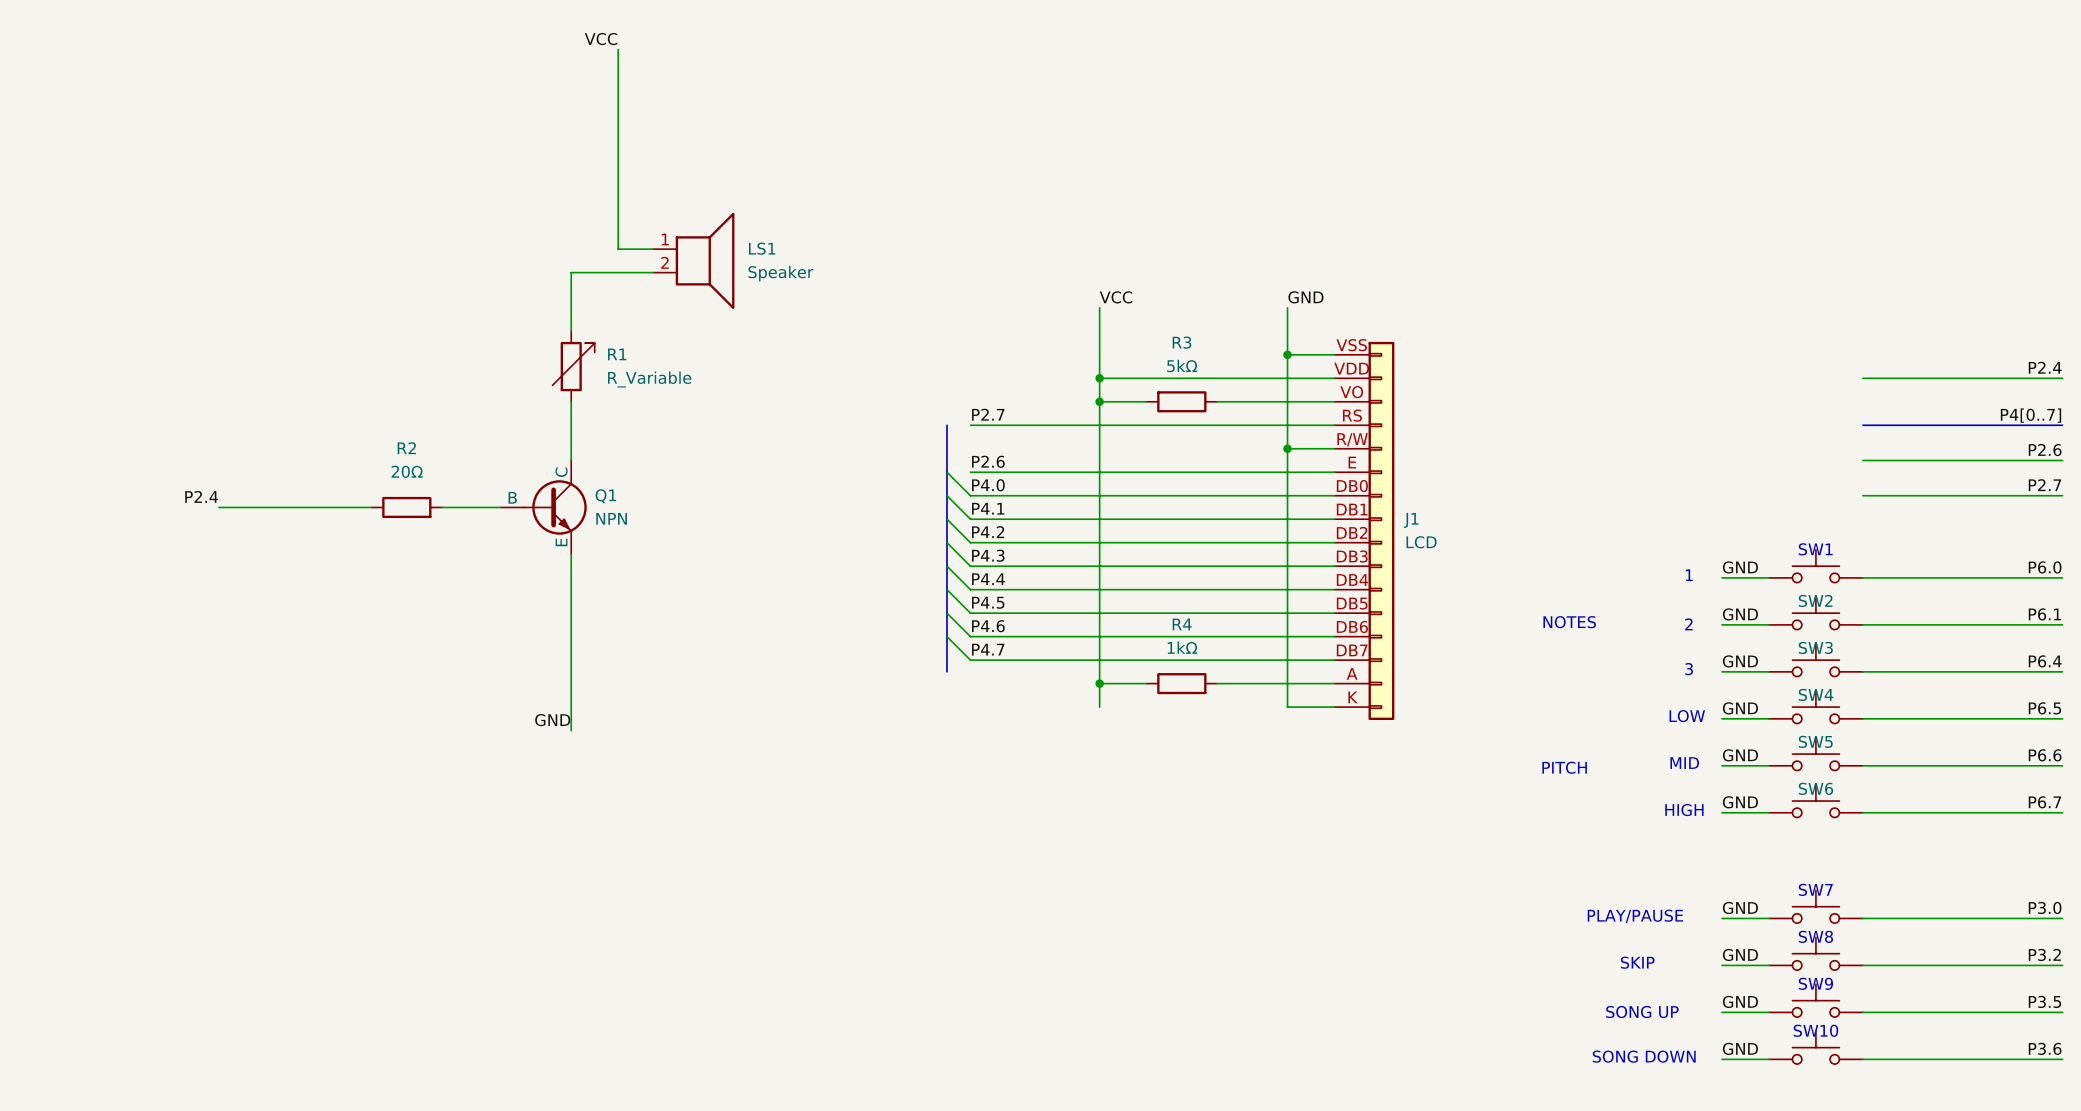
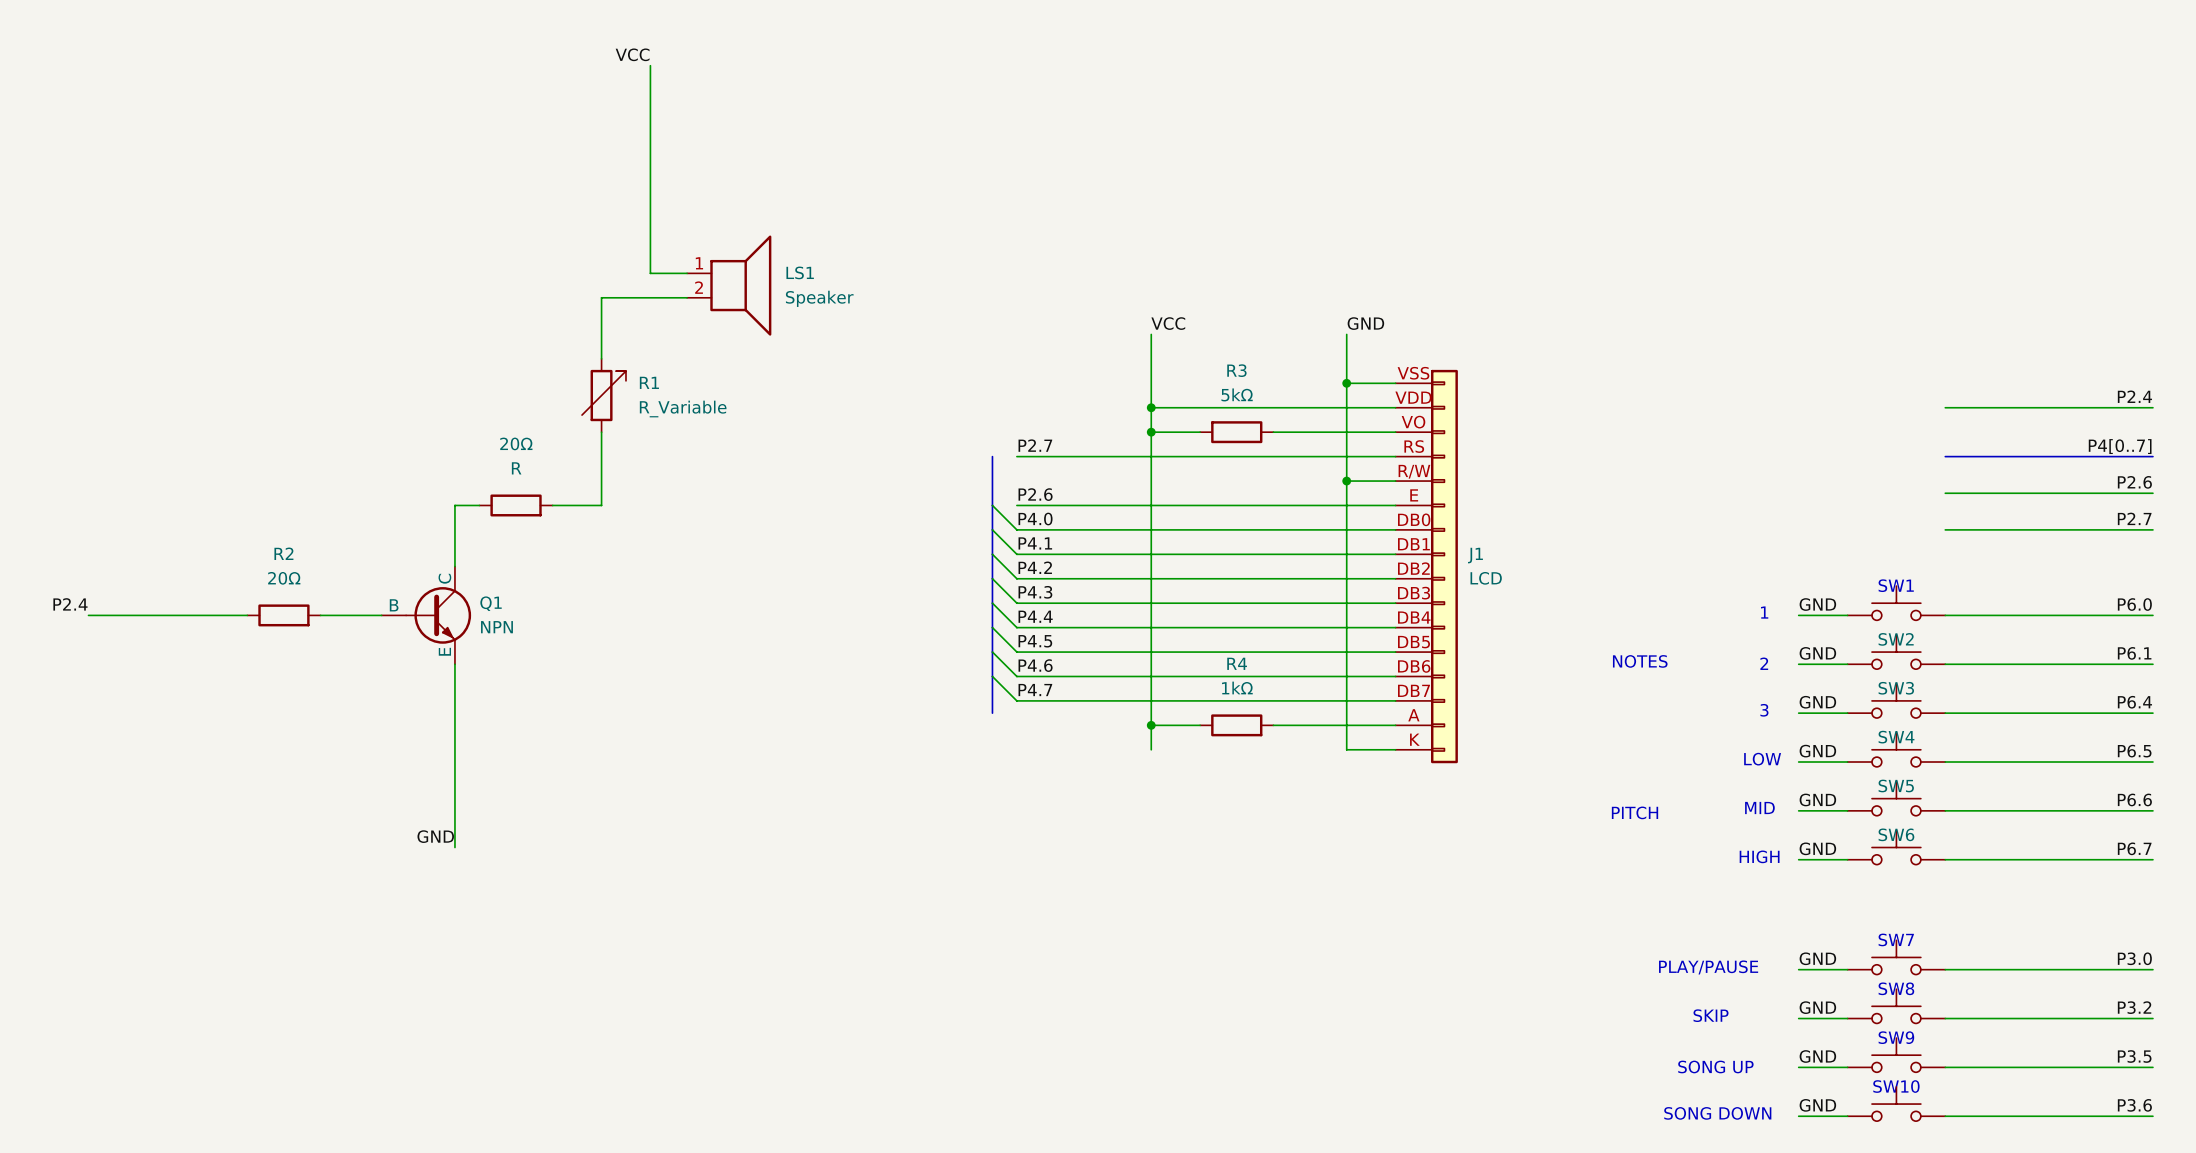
wire: none -> (601, 493) (601, 505) (552, 505)
wire: none -> (479, 505) (454, 505) (454, 566)
20Ω: none -> R (516, 505)
label position: P2.4 (201, 496) -> P2.4 (70, 604)
wire: (218, 507) (371, 507) -> (88, 615) (247, 615)
R2 position: (406, 507) -> (283, 615)
wire: (442, 507) (500, 507) -> (320, 615) (381, 615)
Q1 position: (543, 507) -> (426, 615)
wire: (571, 554) (571, 730) -> (454, 664) (454, 847)
label position: GND (552, 720) -> GND (435, 836)

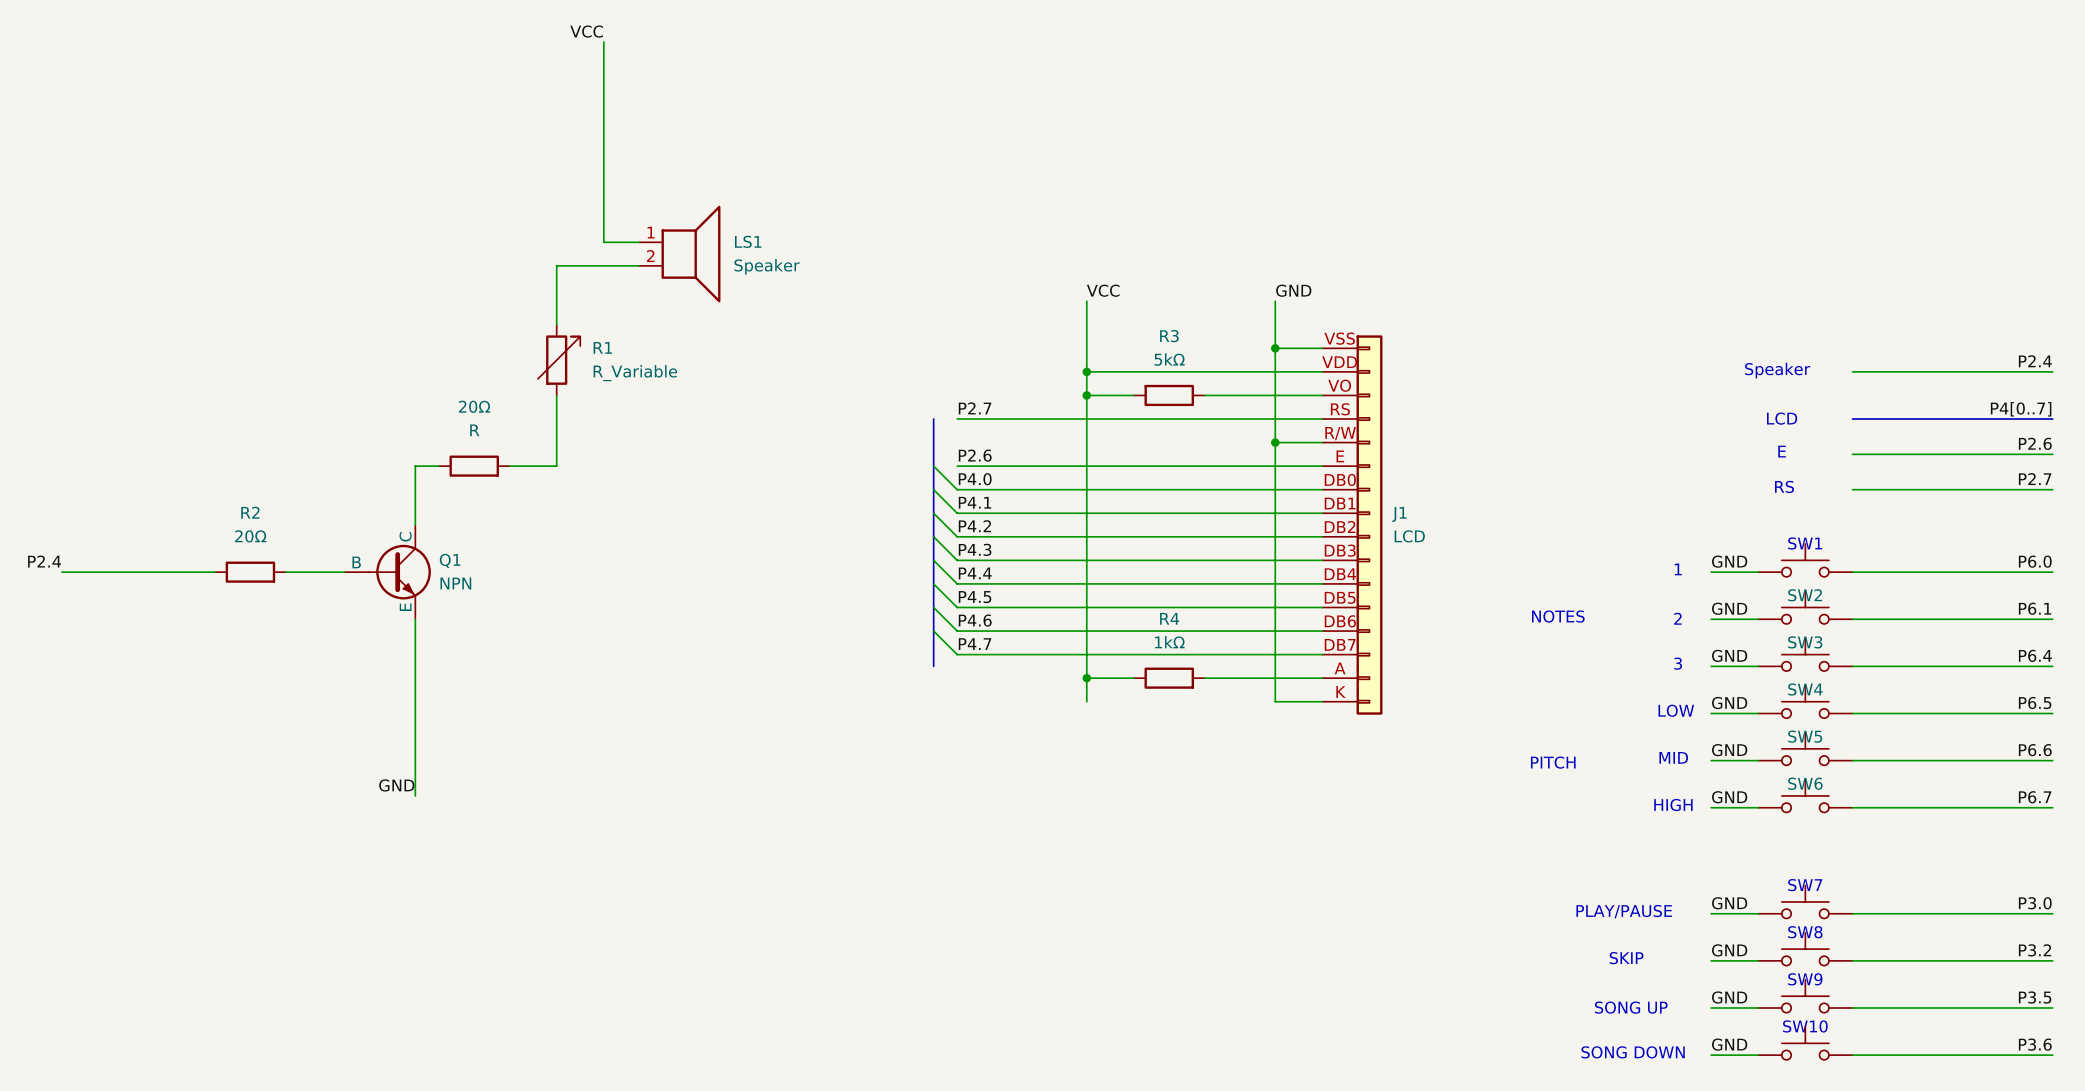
text: none -> Speaker (1777, 370)
text: none -> LCD (1782, 418)
text: none -> E (1782, 451)
text: none -> RS (1784, 486)

